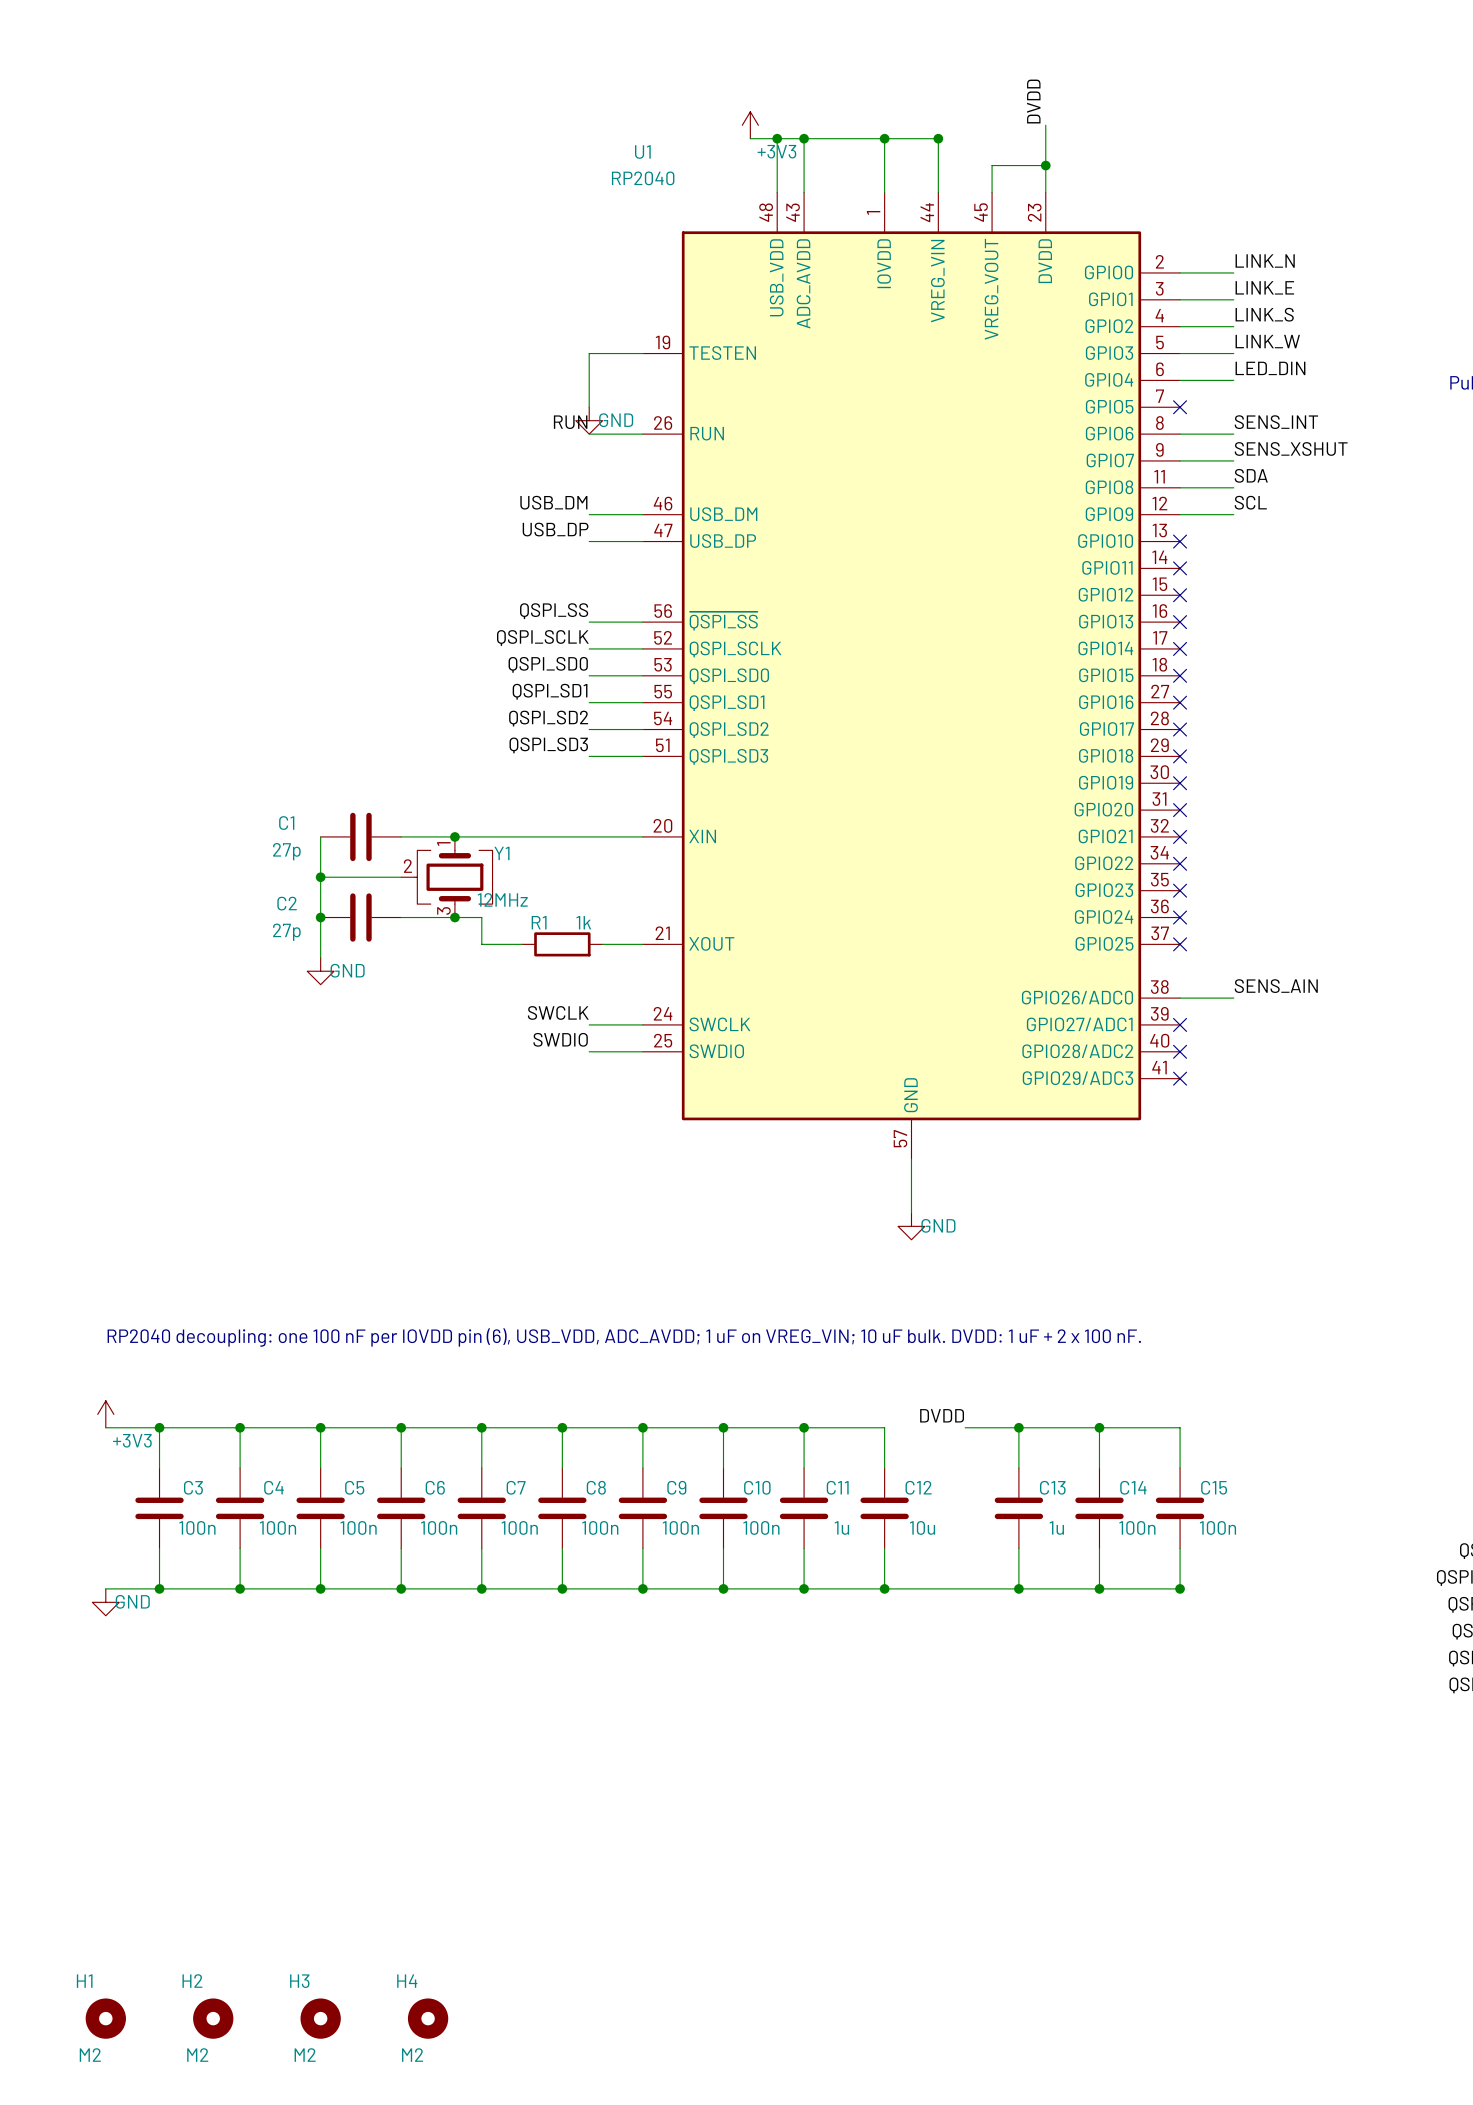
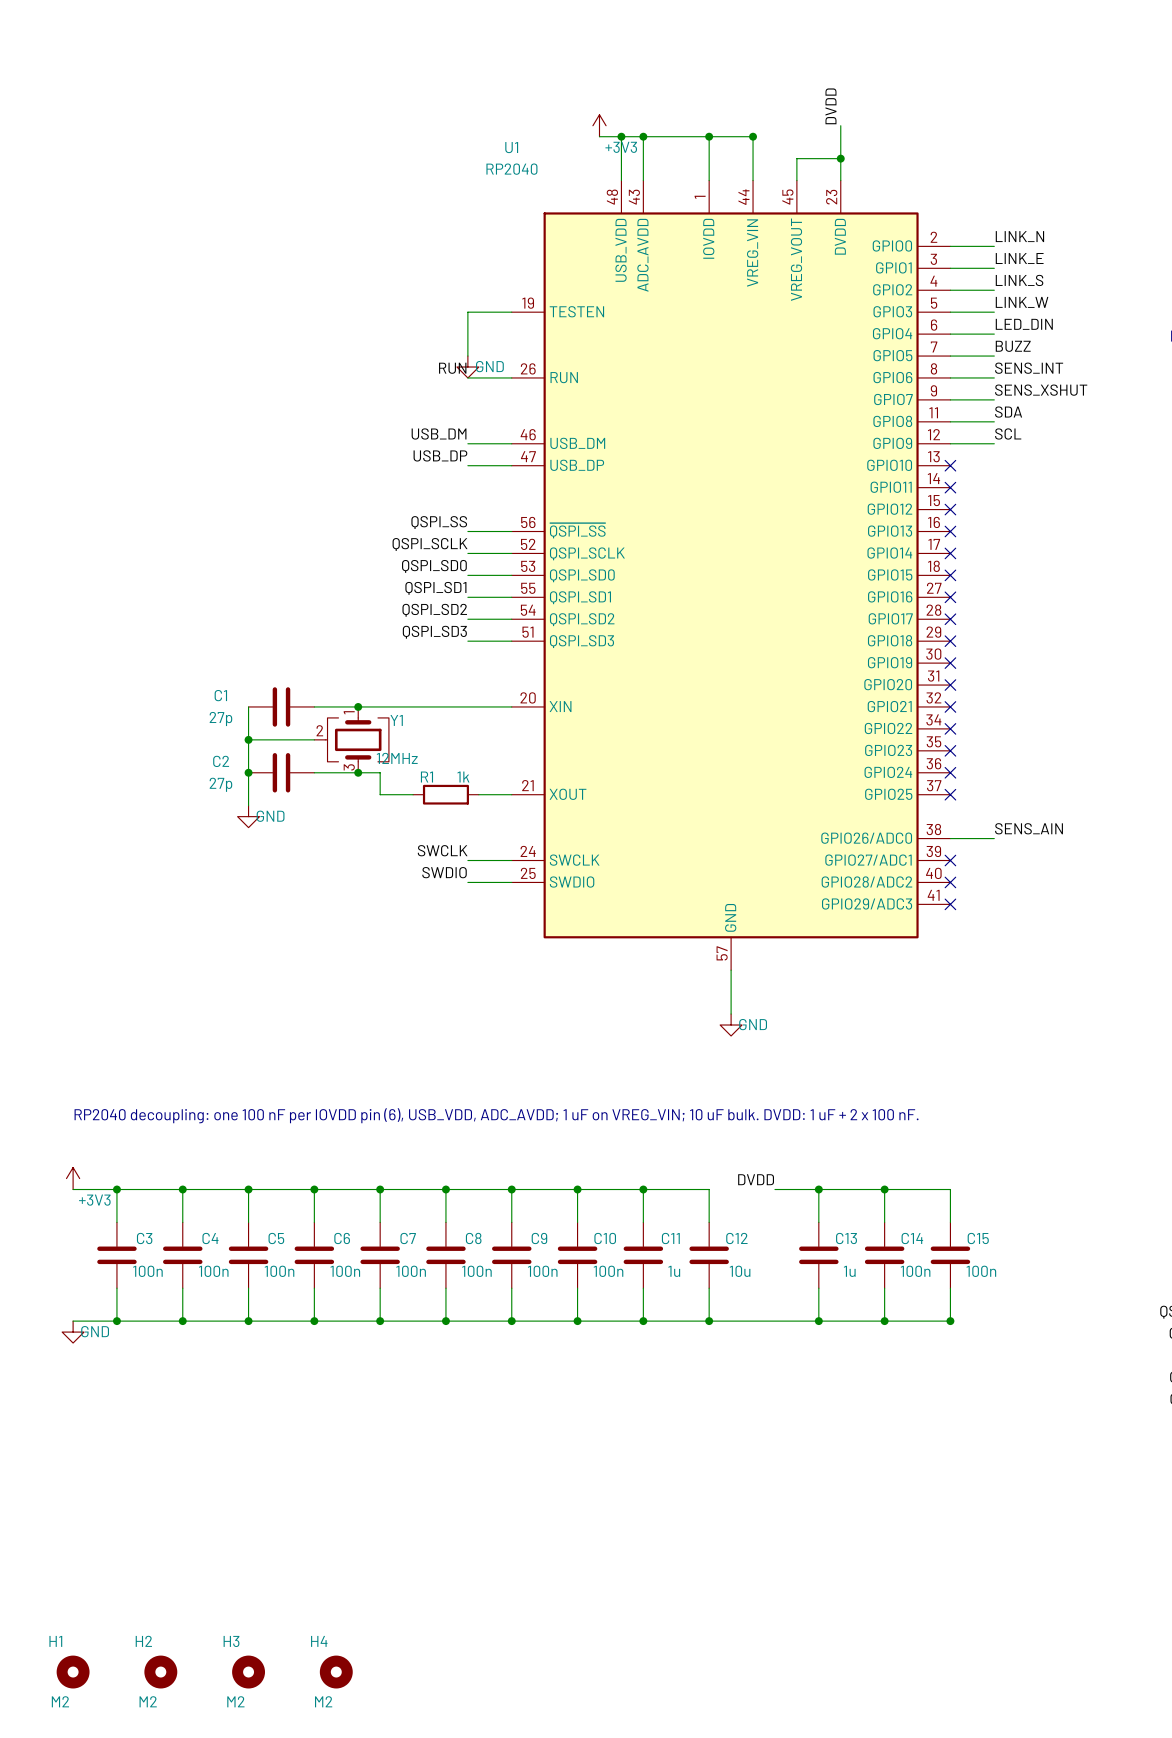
label: none -> BUZZ (1013, 346)
wire: none -> (950, 356) (994, 356)
no-connect mark: (1180, 407) -> none

